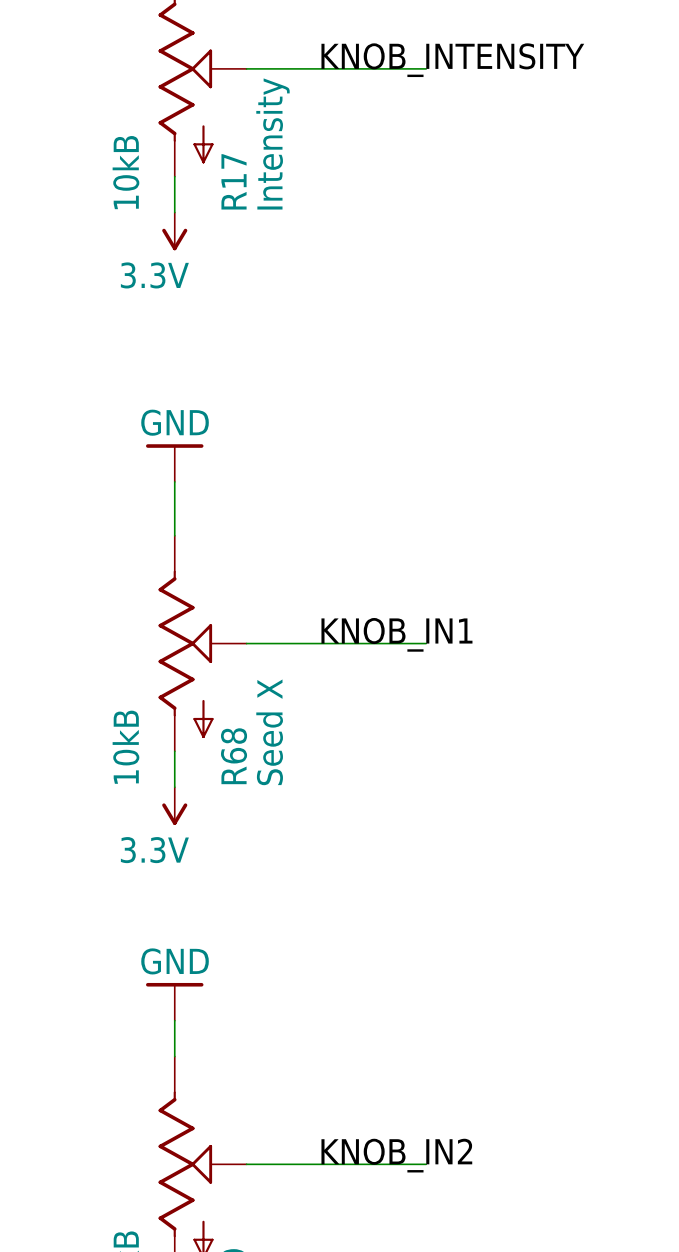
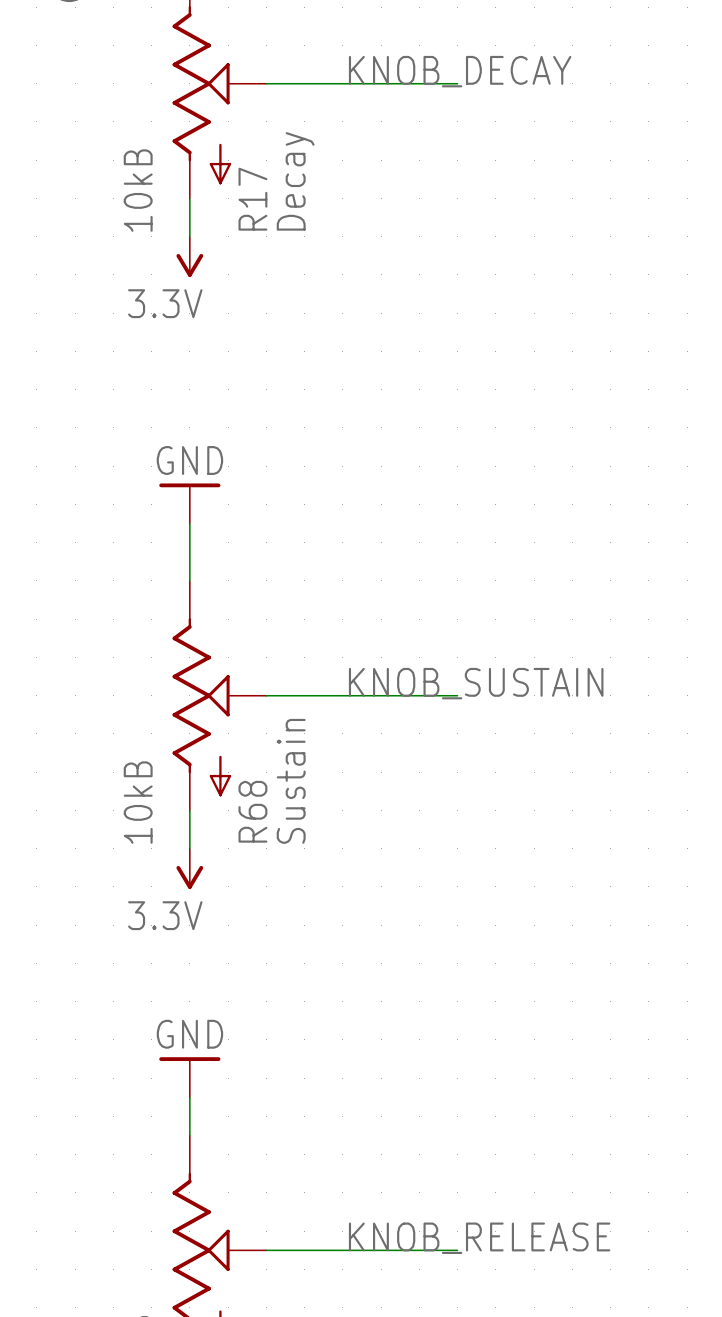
label: KNOB_INTENSITY (452, 60) -> KNOB_DECAY (460, 71)
R17 text: Intensity (272, 143) -> Decay (295, 181)
label: KNOB_IN1 (396, 634) -> KNOB_SUSTAIN (476, 683)
R68 text: Seed X (269, 732) -> Sustain (291, 781)
label: KNOB_IN2 (396, 1155) -> KNOB_RELEASE (479, 1238)

